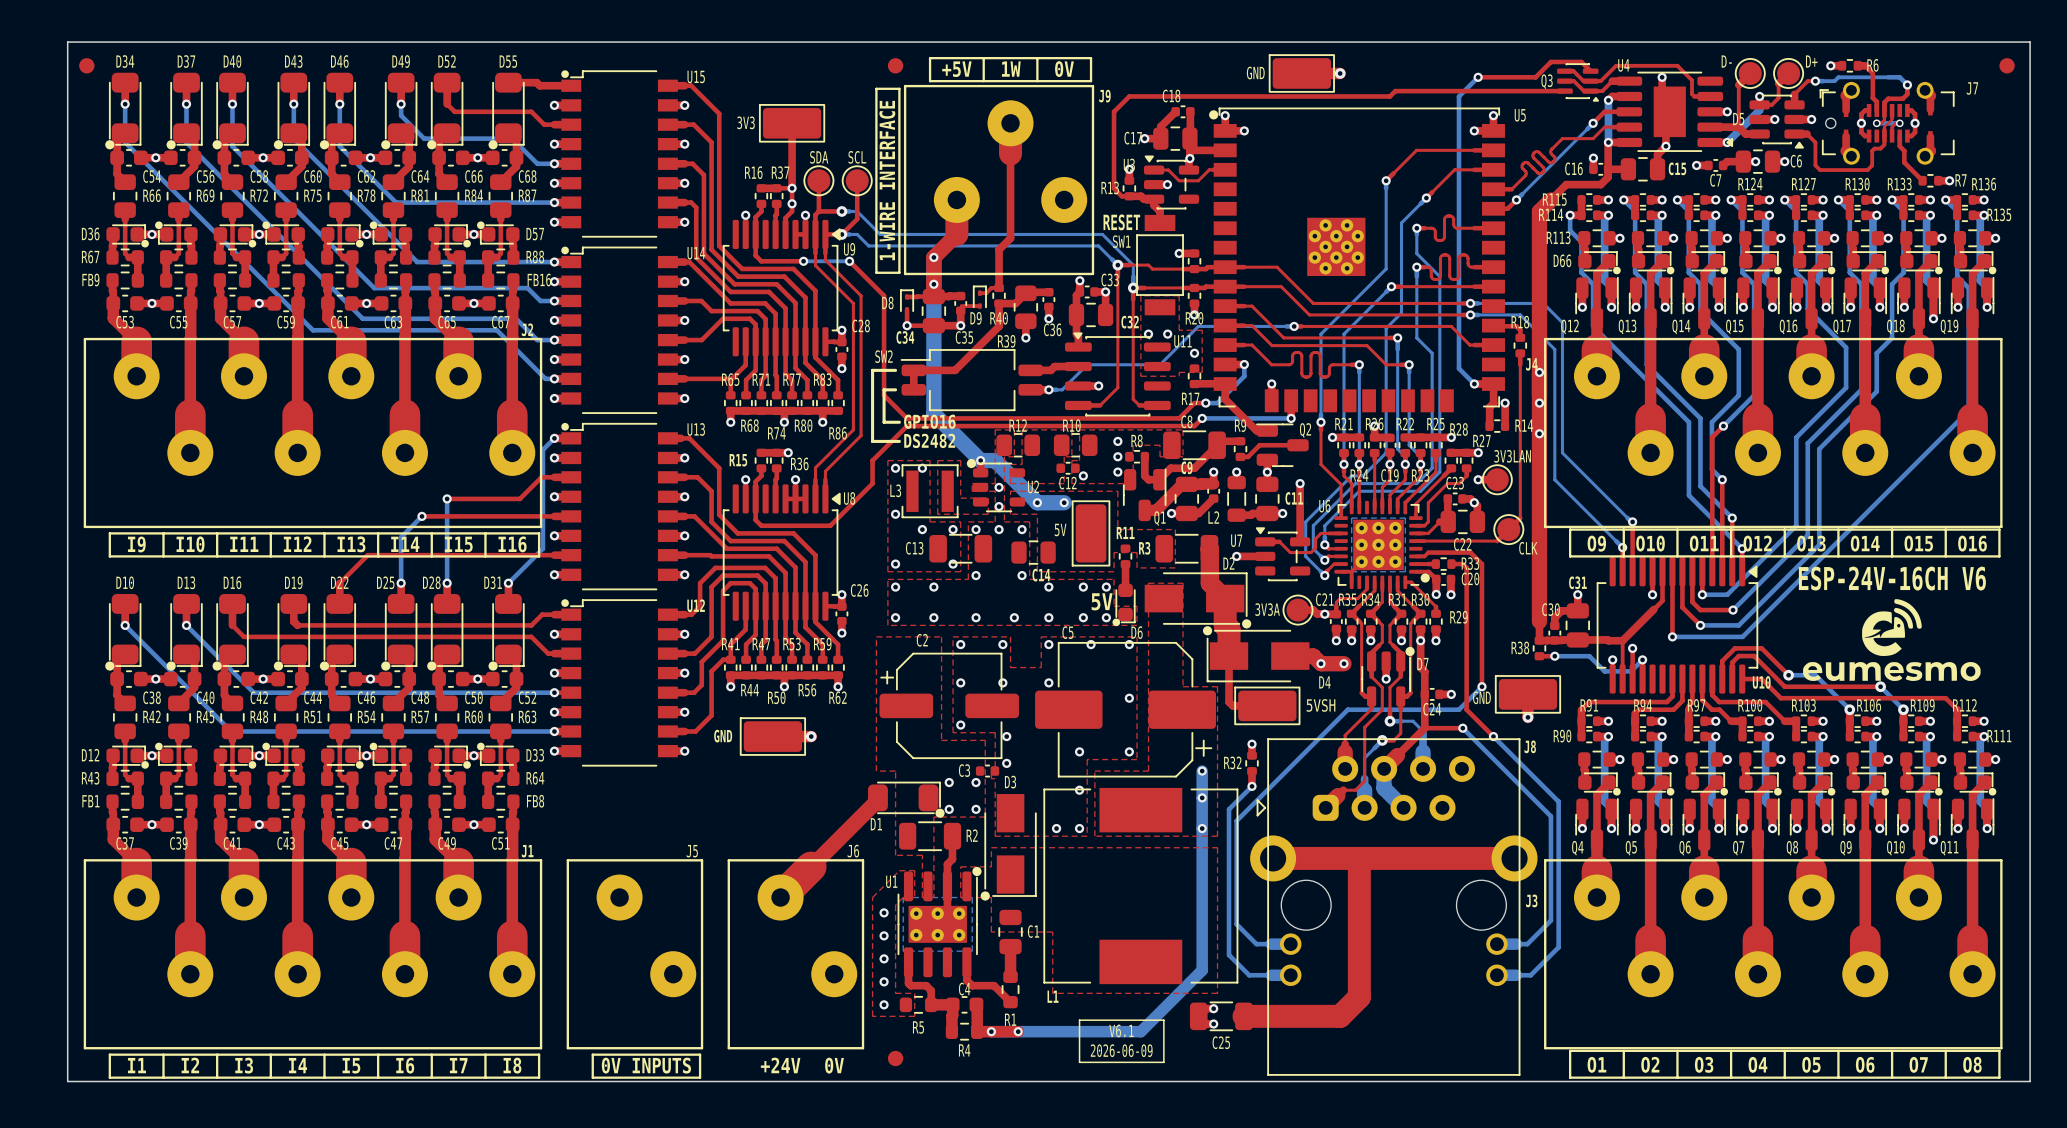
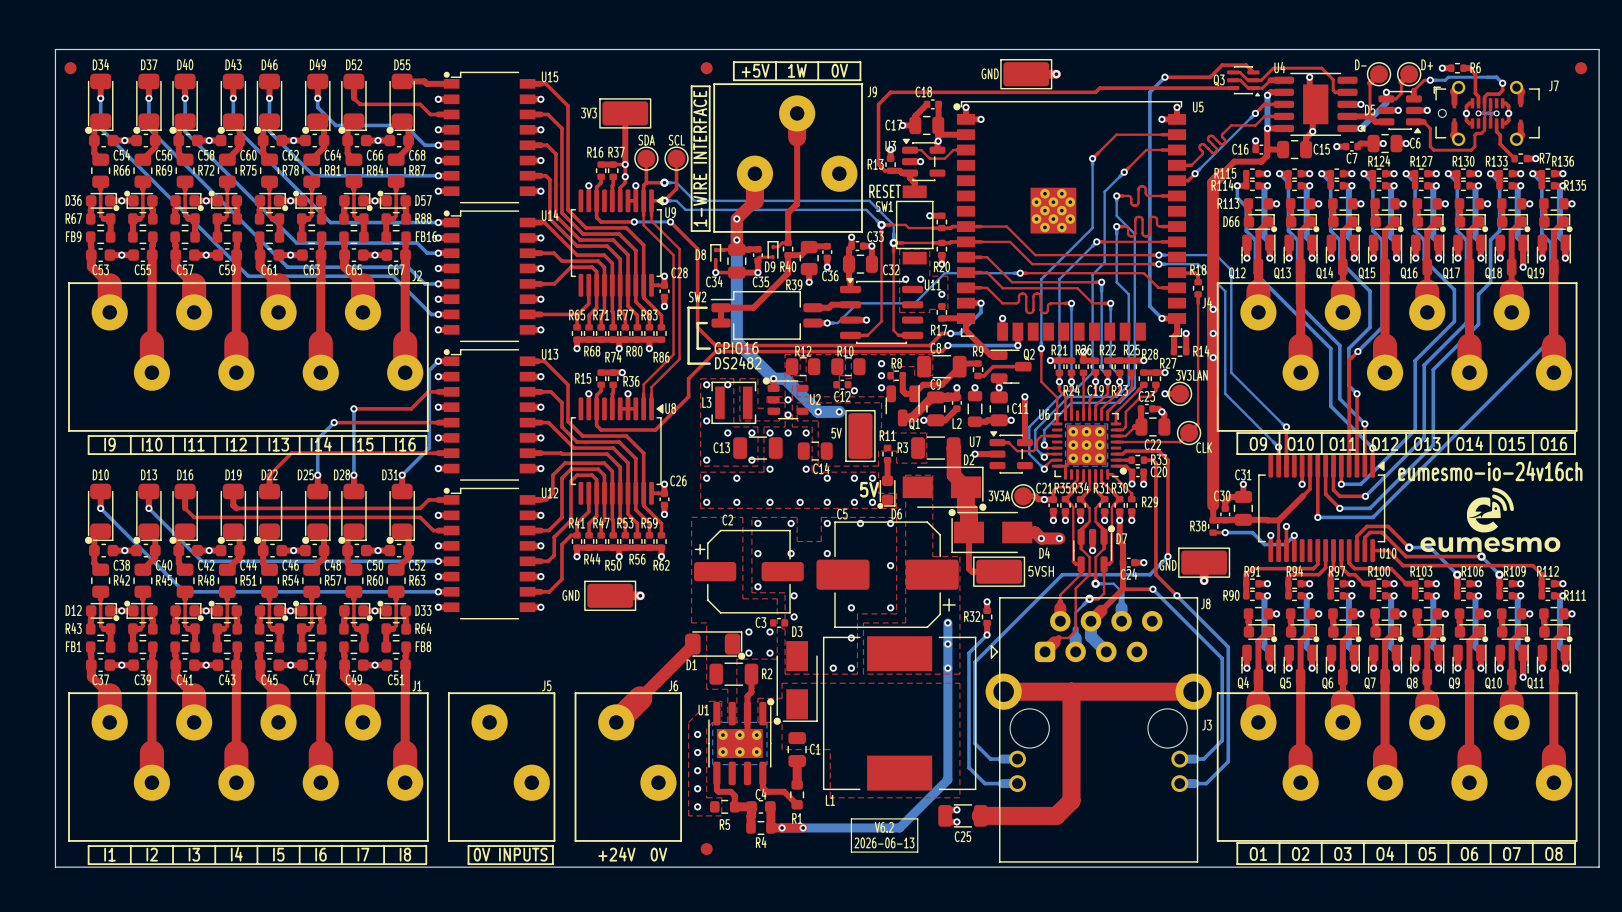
text: ESP-24V-16CH V6 (1892, 578) -> eumesmo-io-24v16ch (1490, 471)
text: V6.1 (1121, 1030) -> V6.2 (884, 827)
text: 2026-06-09 (1121, 1050) -> 2026-06-13 (884, 842)

